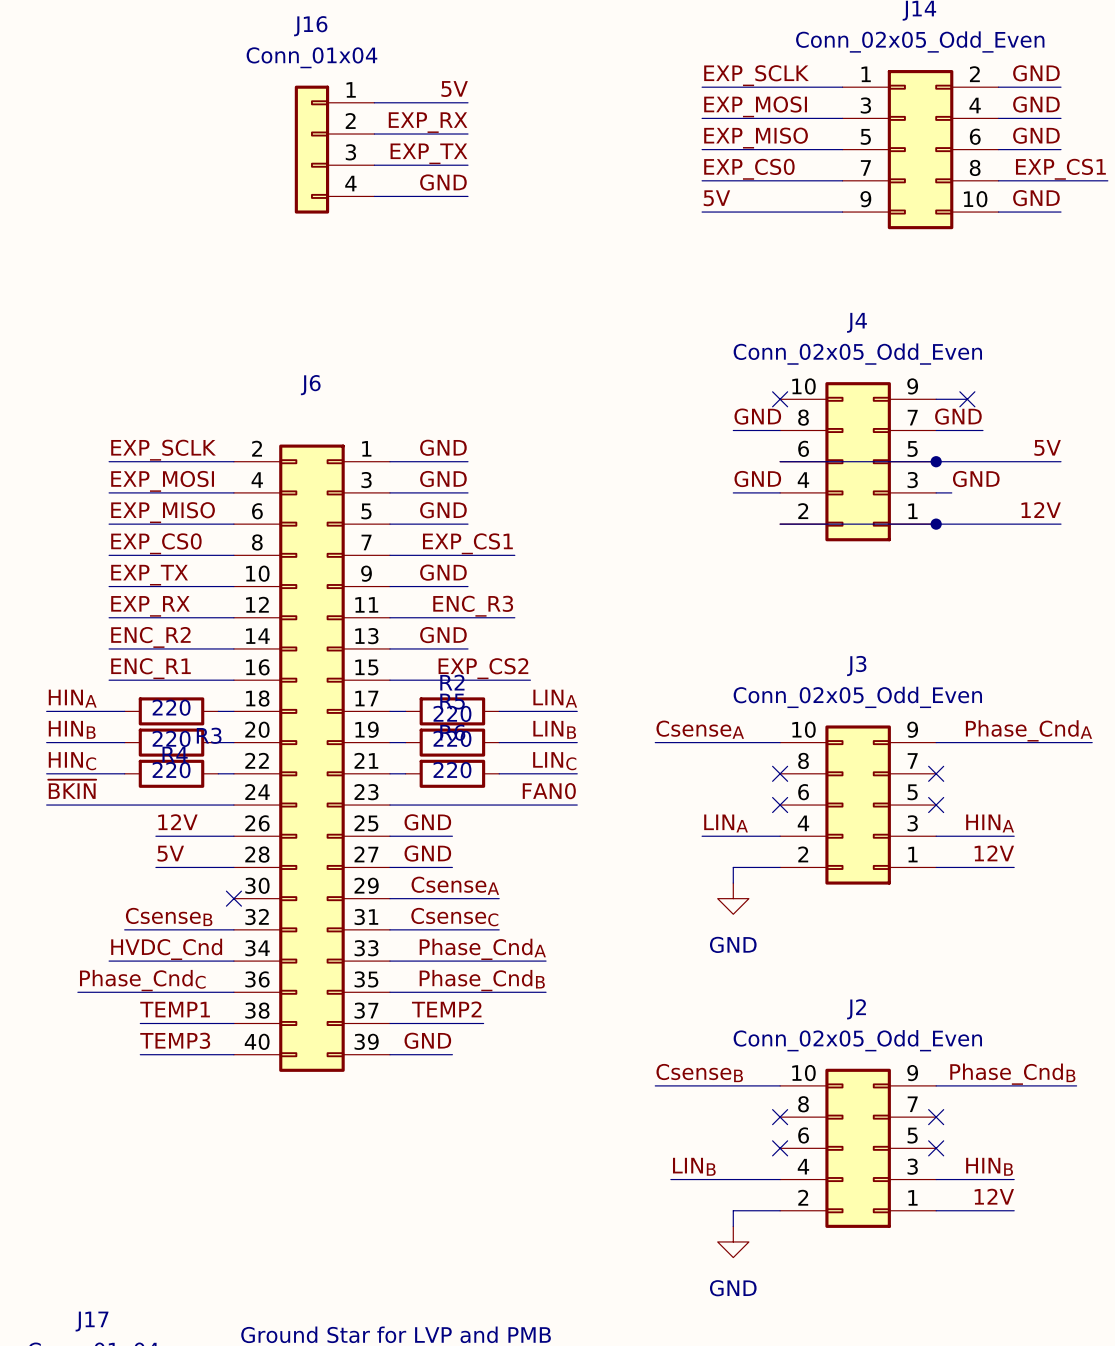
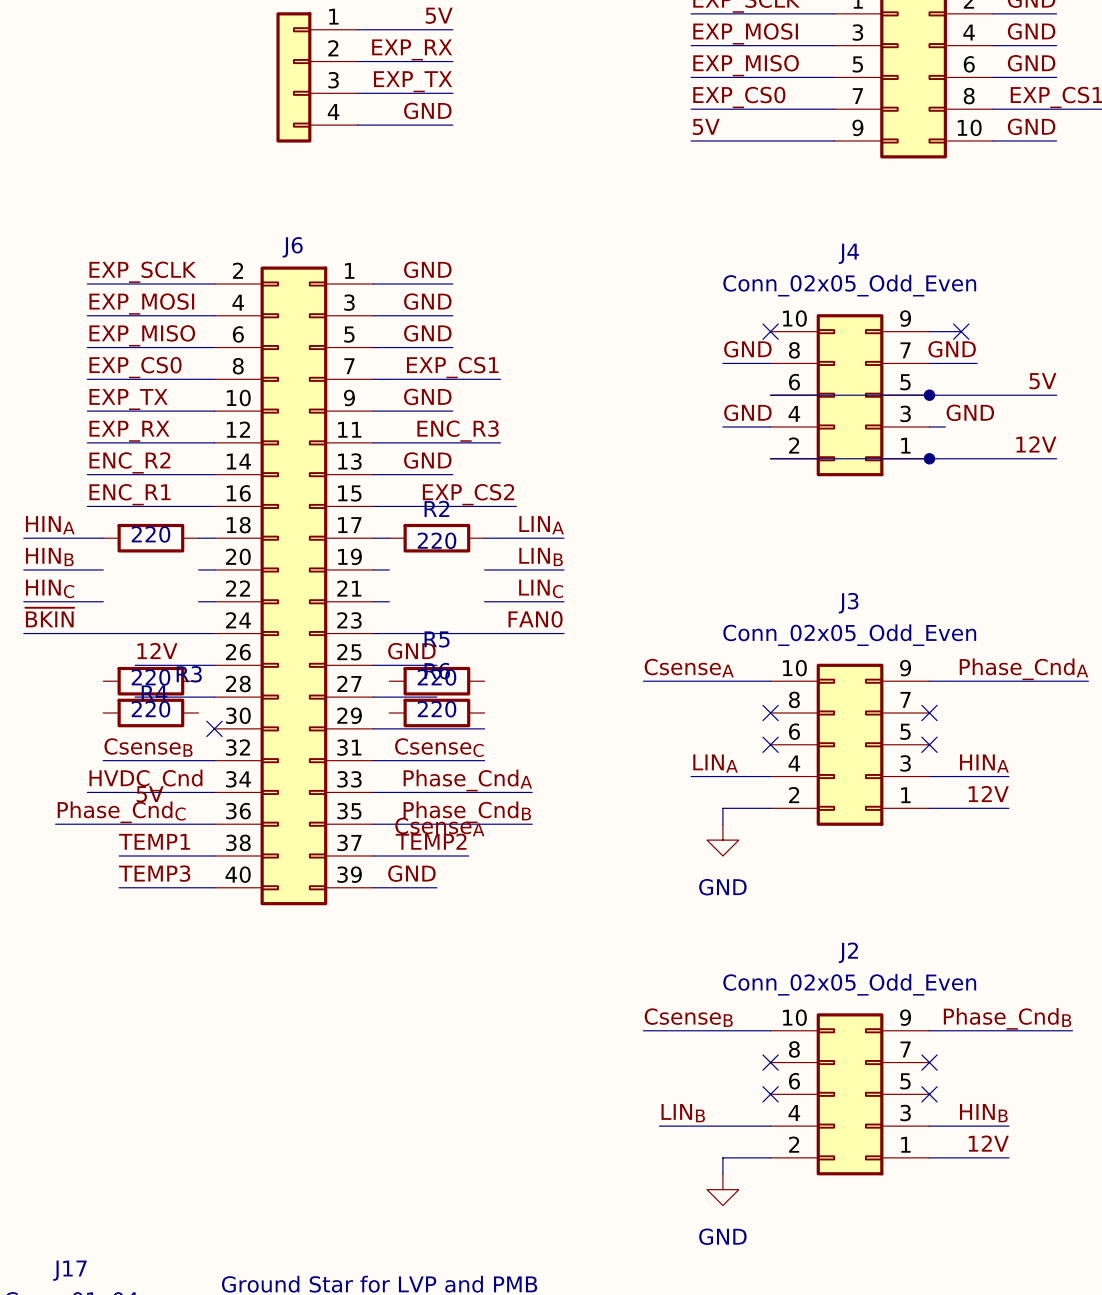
label: none -> GND (427, 269)
label: none -> GND (427, 301)
J6 name position: J6 (310, 385) -> J6 (292, 247)
label: none -> GND (427, 333)
label: GND (443, 447) -> none
label position: EXP_SCLK (163, 450) -> EXP_SCLK (142, 272)
wire: (109, 461) (233, 461) -> (87, 283) (214, 283)
wire: (389, 461) (468, 461) -> (373, 283) (452, 283)
label: none -> GND (427, 396)
label: GND (443, 479) -> none
label position: EXP_MOSI (162, 481) -> EXP_MOSI (141, 304)
wire: (109, 492) (233, 492) -> (87, 315) (214, 315)
wire: (389, 492) (468, 492) -> (373, 315) (452, 315)
label position: GND (443, 510) -> GND (427, 460)
label position: EXP_MISO (163, 512) -> EXP_MISO (142, 335)
wire: (109, 524) (233, 524) -> (87, 347) (214, 347)
wire: (389, 524) (468, 524) -> (373, 347) (452, 347)
label position: EXP_CS0 (156, 543) -> EXP_CS0 (135, 367)
label position: EXP_CS1 (467, 543) -> EXP_CS1 (452, 367)
wire: (109, 555) (233, 555) -> (87, 379) (214, 379)
wire: (389, 555) (514, 555) -> (373, 379) (500, 379)
label: GND (443, 572) -> none
label position: EXP_TX (149, 575) -> EXP_TX (128, 399)
wire: (109, 586) (233, 586) -> (87, 411) (214, 411)
wire: (389, 586) (468, 586) -> (373, 411) (452, 411)
label position: EXP_RX (150, 606) -> EXP_RX (129, 431)
label position: ENC_R3 (473, 606) -> ENC_R3 (458, 431)
wire: (109, 617) (233, 617) -> (87, 442) (214, 442)
wire: (389, 617) (514, 617) -> (373, 442) (500, 442)
label: GND (443, 635) -> none
label position: ENC_R2 (150, 637) -> ENC_R2 (129, 462)
wire: (109, 648) (233, 648) -> (87, 474) (214, 474)
wire: (389, 648) (468, 648) -> (373, 474) (452, 474)
label position: ENC_R1 (150, 668) -> ENC_R1 (130, 494)
label position: EXP_CS2 (483, 668) -> EXP_CS2 (468, 494)
wire: (109, 680) (233, 680) -> (87, 506) (214, 506)
wire: (389, 680) (530, 680) -> (373, 506) (516, 506)
label position: HINA (72, 698) -> HINA (50, 525)
label position: LINA (555, 698) -> LINA (541, 525)
wire: (46, 711) (124, 711) -> (23, 538) (103, 538)
part position: (171, 711) -> (150, 538)
wire: (218, 711) (233, 711) -> (198, 538) (214, 538)
wire: (389, 711) (405, 711) -> (373, 538) (389, 538)
R2 position: (452, 711) -> (436, 538)
wire: (499, 711) (577, 711) -> (484, 538) (564, 538)
label: none -> GND (411, 651)
label position: HINB (72, 729) -> HINB (49, 557)
label position: LINB (554, 729) -> LINB (541, 557)
wire: (46, 742) (124, 742) -> (23, 569) (103, 569)
wire: (218, 742) (233, 742) -> (198, 569) (214, 569)
wire: (389, 742) (405, 742) -> (373, 569) (389, 569)
wire: (499, 742) (577, 742) -> (484, 569) (564, 569)
J6 position: (311, 758) -> (293, 585)
label position: HINC (72, 761) -> HINC (50, 588)
label position: LINC (554, 761) -> LINC (541, 588)
wire: (46, 773) (124, 773) -> (23, 601) (103, 601)
wire: (218, 773) (233, 773) -> (198, 601) (214, 601)
wire: (389, 773) (405, 773) -> (373, 601) (389, 601)
wire: (499, 773) (577, 773) -> (484, 601) (564, 601)
label position: ~{BKIN} (72, 789) -> ~{BKIN} (49, 617)
no-connect mark: none -> (214, 728)
label position: FAN0 (549, 791) -> FAN0 (535, 619)
wire: (46, 805) (233, 805) -> (23, 633) (214, 633)
wire: (389, 805) (577, 805) -> (373, 633) (564, 633)
label position: 12V (177, 822) -> 12V (157, 651)
label: GND (427, 822) -> none
wire: (155, 836) (233, 836) -> (135, 665) (214, 665)
wire: (389, 836) (452, 836) -> (373, 665) (436, 665)
label: GND (427, 853) -> none
wire: (155, 867) (233, 867) -> (135, 697) (214, 697)
wire: (389, 867) (452, 867) -> (373, 697) (436, 697)
no-connect mark: (233, 898) -> none
wire: (389, 898) (499, 898) -> (373, 728) (484, 728)
label position: CsenseB (169, 916) -> CsenseB (148, 747)
label position: CsenseC (454, 917) -> CsenseC (439, 747)
wire: (124, 929) (233, 929) -> (103, 760) (214, 760)
wire: (389, 929) (499, 929) -> (373, 760) (484, 760)
label: none -> GND (411, 873)
label position: HVDC_Cnd (166, 949) -> HVDC_Cnd (145, 780)
label position: Phase_CndA (482, 949) -> Phase_CndA (467, 780)
wire: (109, 961) (233, 961) -> (87, 792) (214, 792)
wire: (389, 961) (546, 961) -> (373, 792) (532, 792)
label position: Phase_CndC (142, 980) -> Phase_CndC (121, 812)
label position: Phase_CndB (482, 980) -> Phase_CndB (467, 812)
wire: (77, 992) (233, 992) -> (55, 824) (214, 824)
wire: (389, 992) (546, 992) -> (373, 824) (532, 824)
label position: TEMP1 (175, 1009) -> TEMP1 (154, 841)
label position: TEMP2 (446, 1009) -> TEMP2 (431, 841)
wire: (140, 1023) (233, 1023) -> (119, 855) (214, 855)
wire: (389, 1023) (483, 1023) -> (373, 855) (468, 855)
label position: TEMP3 (175, 1040) -> TEMP3 (154, 873)
label: GND (427, 1040) -> none
wire: (140, 1054) (233, 1054) -> (119, 887) (214, 887)
wire: (389, 1054) (452, 1054) -> (373, 887) (436, 887)

